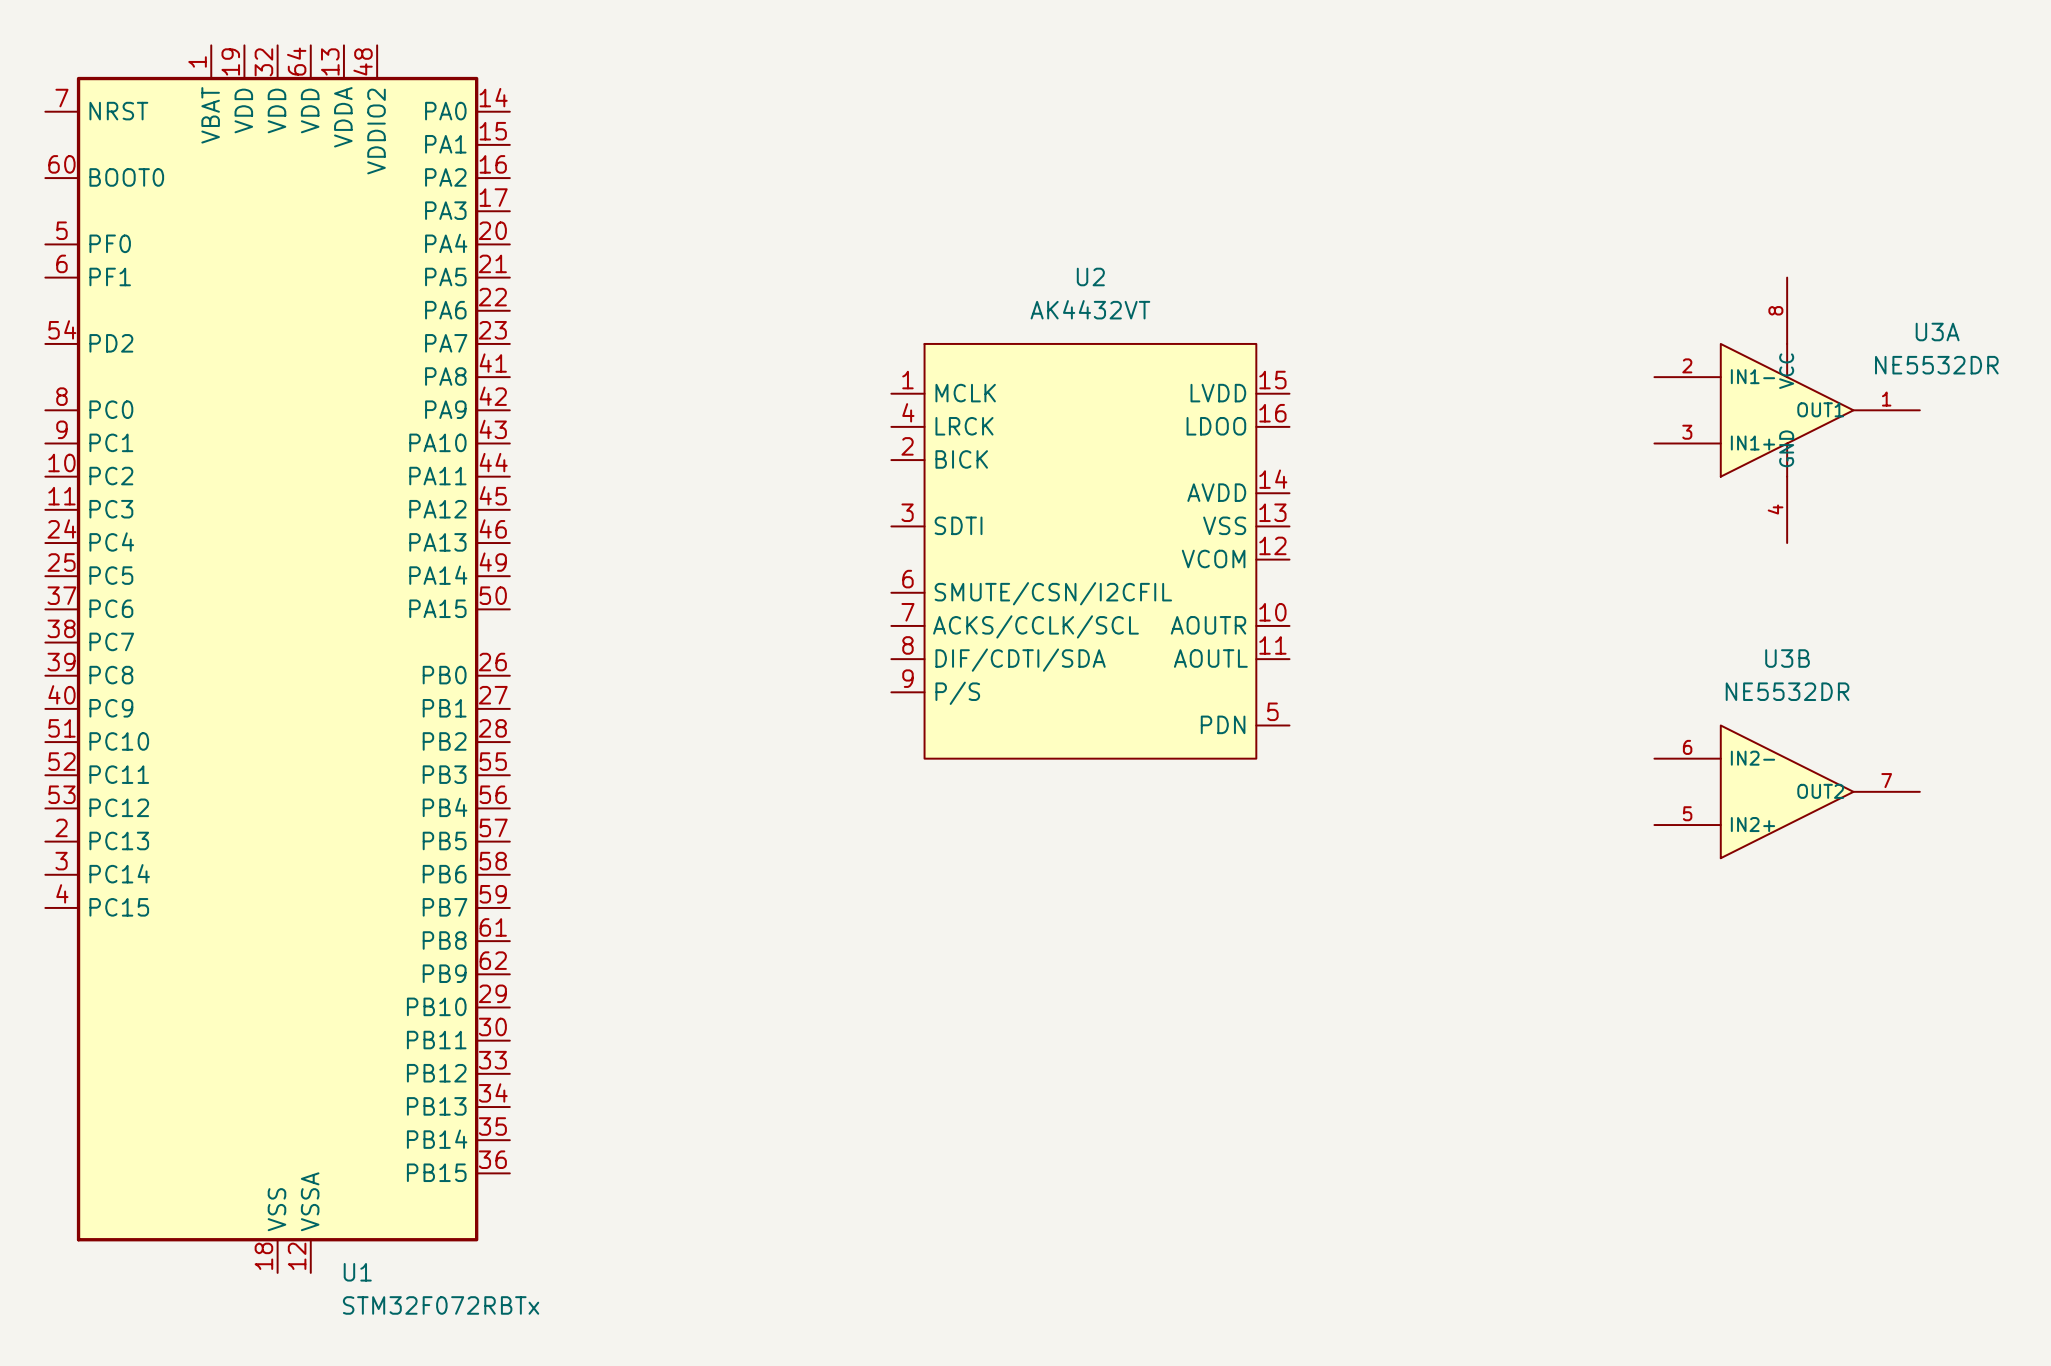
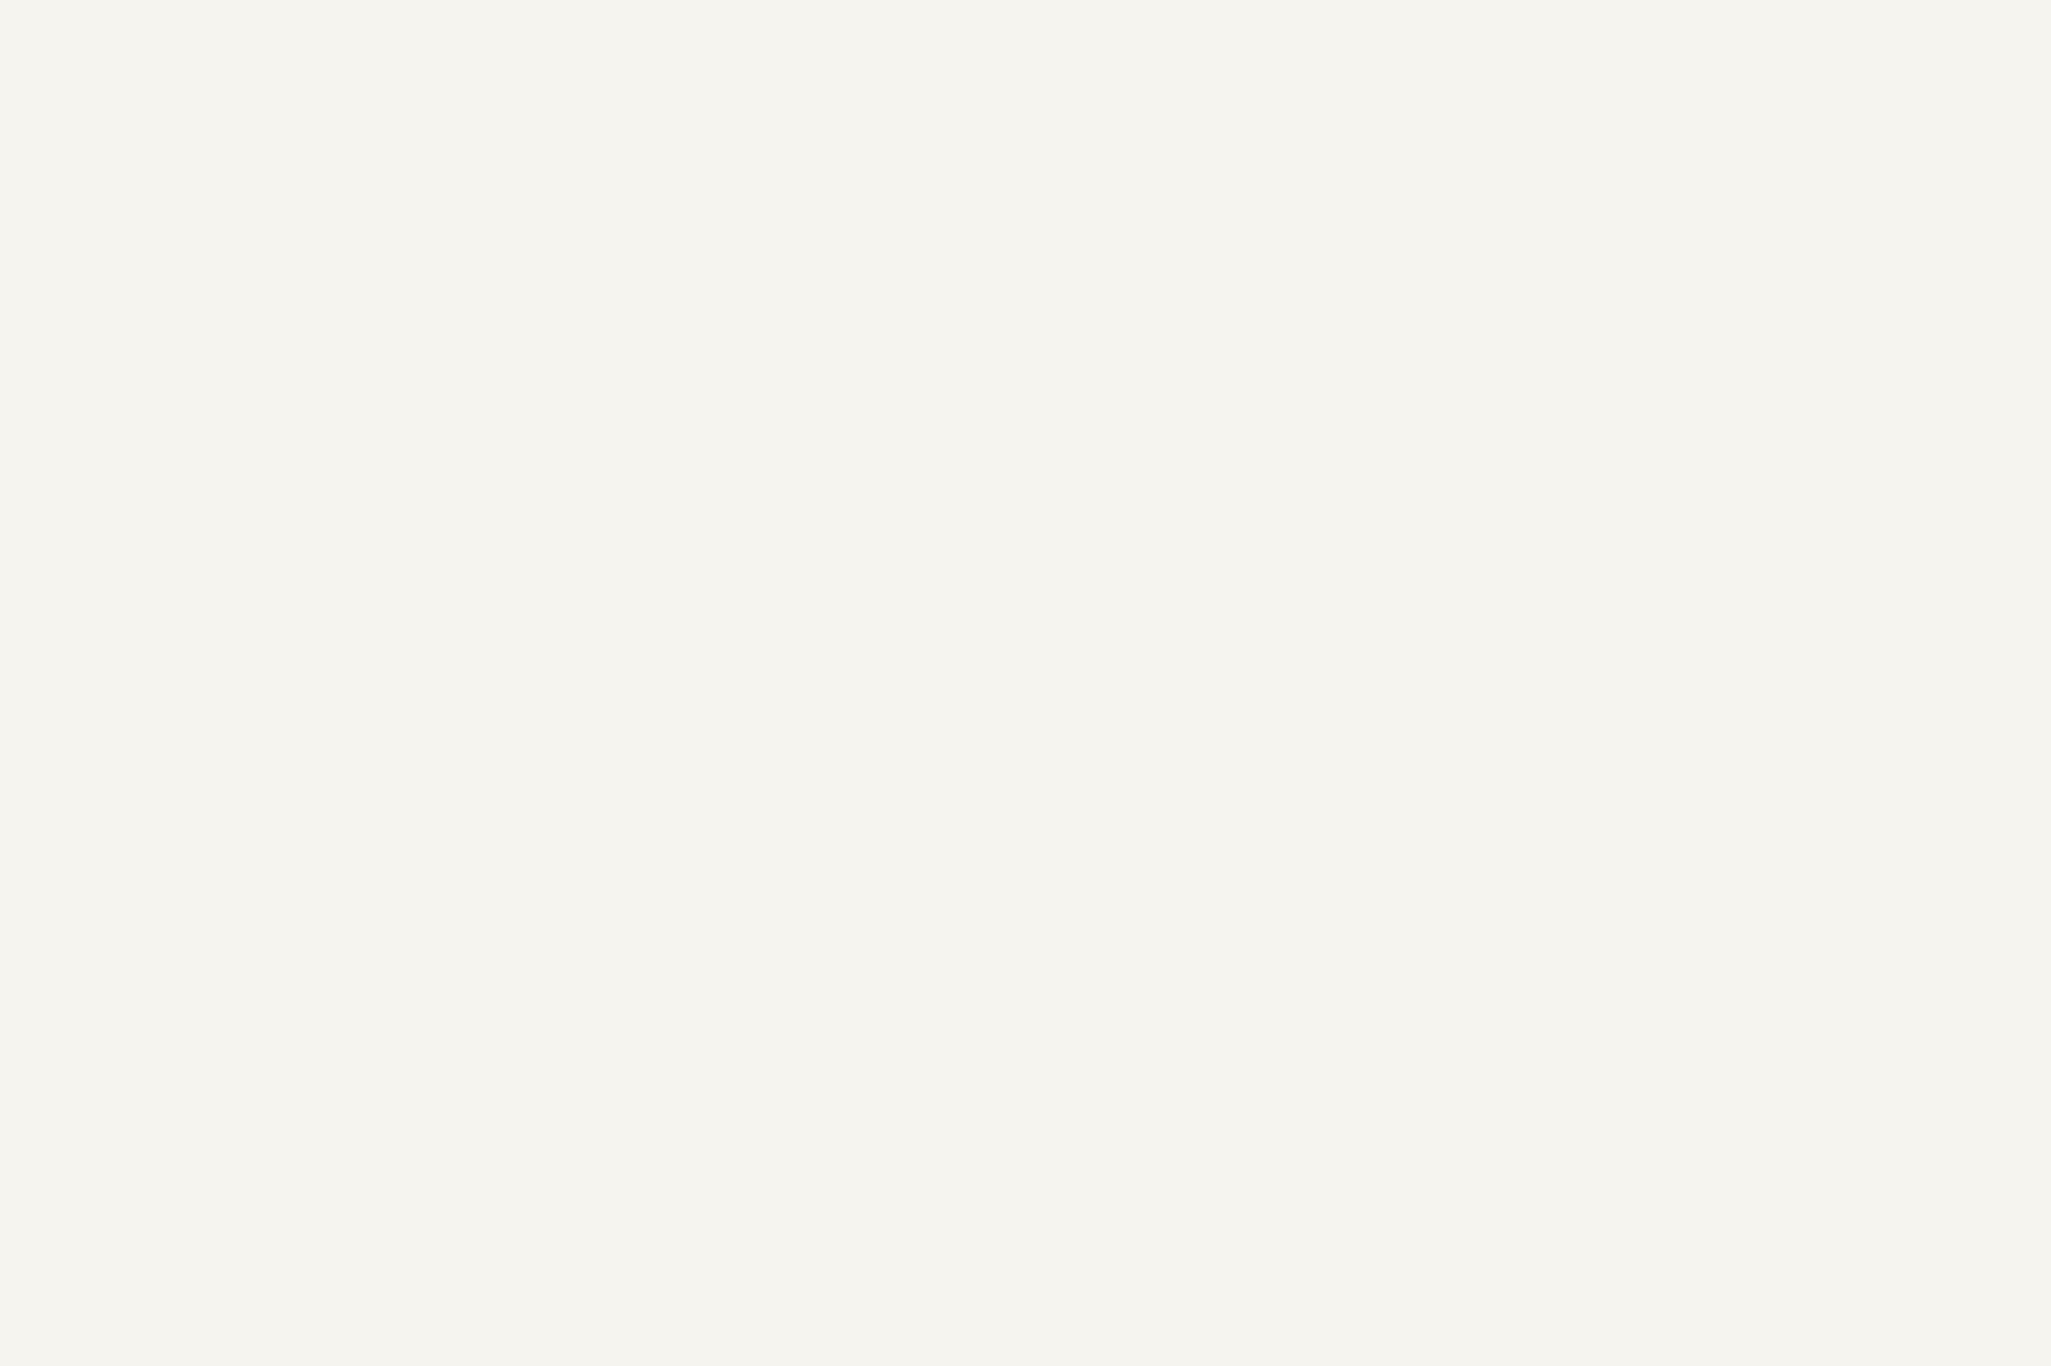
U3A: NE5532DR (1787, 410) -> none
U2: AK4432VT (1090, 551) -> none
U1: STM32F072RBTx (277, 659) -> none
U3B: NE5532DR (1787, 791) -> none

